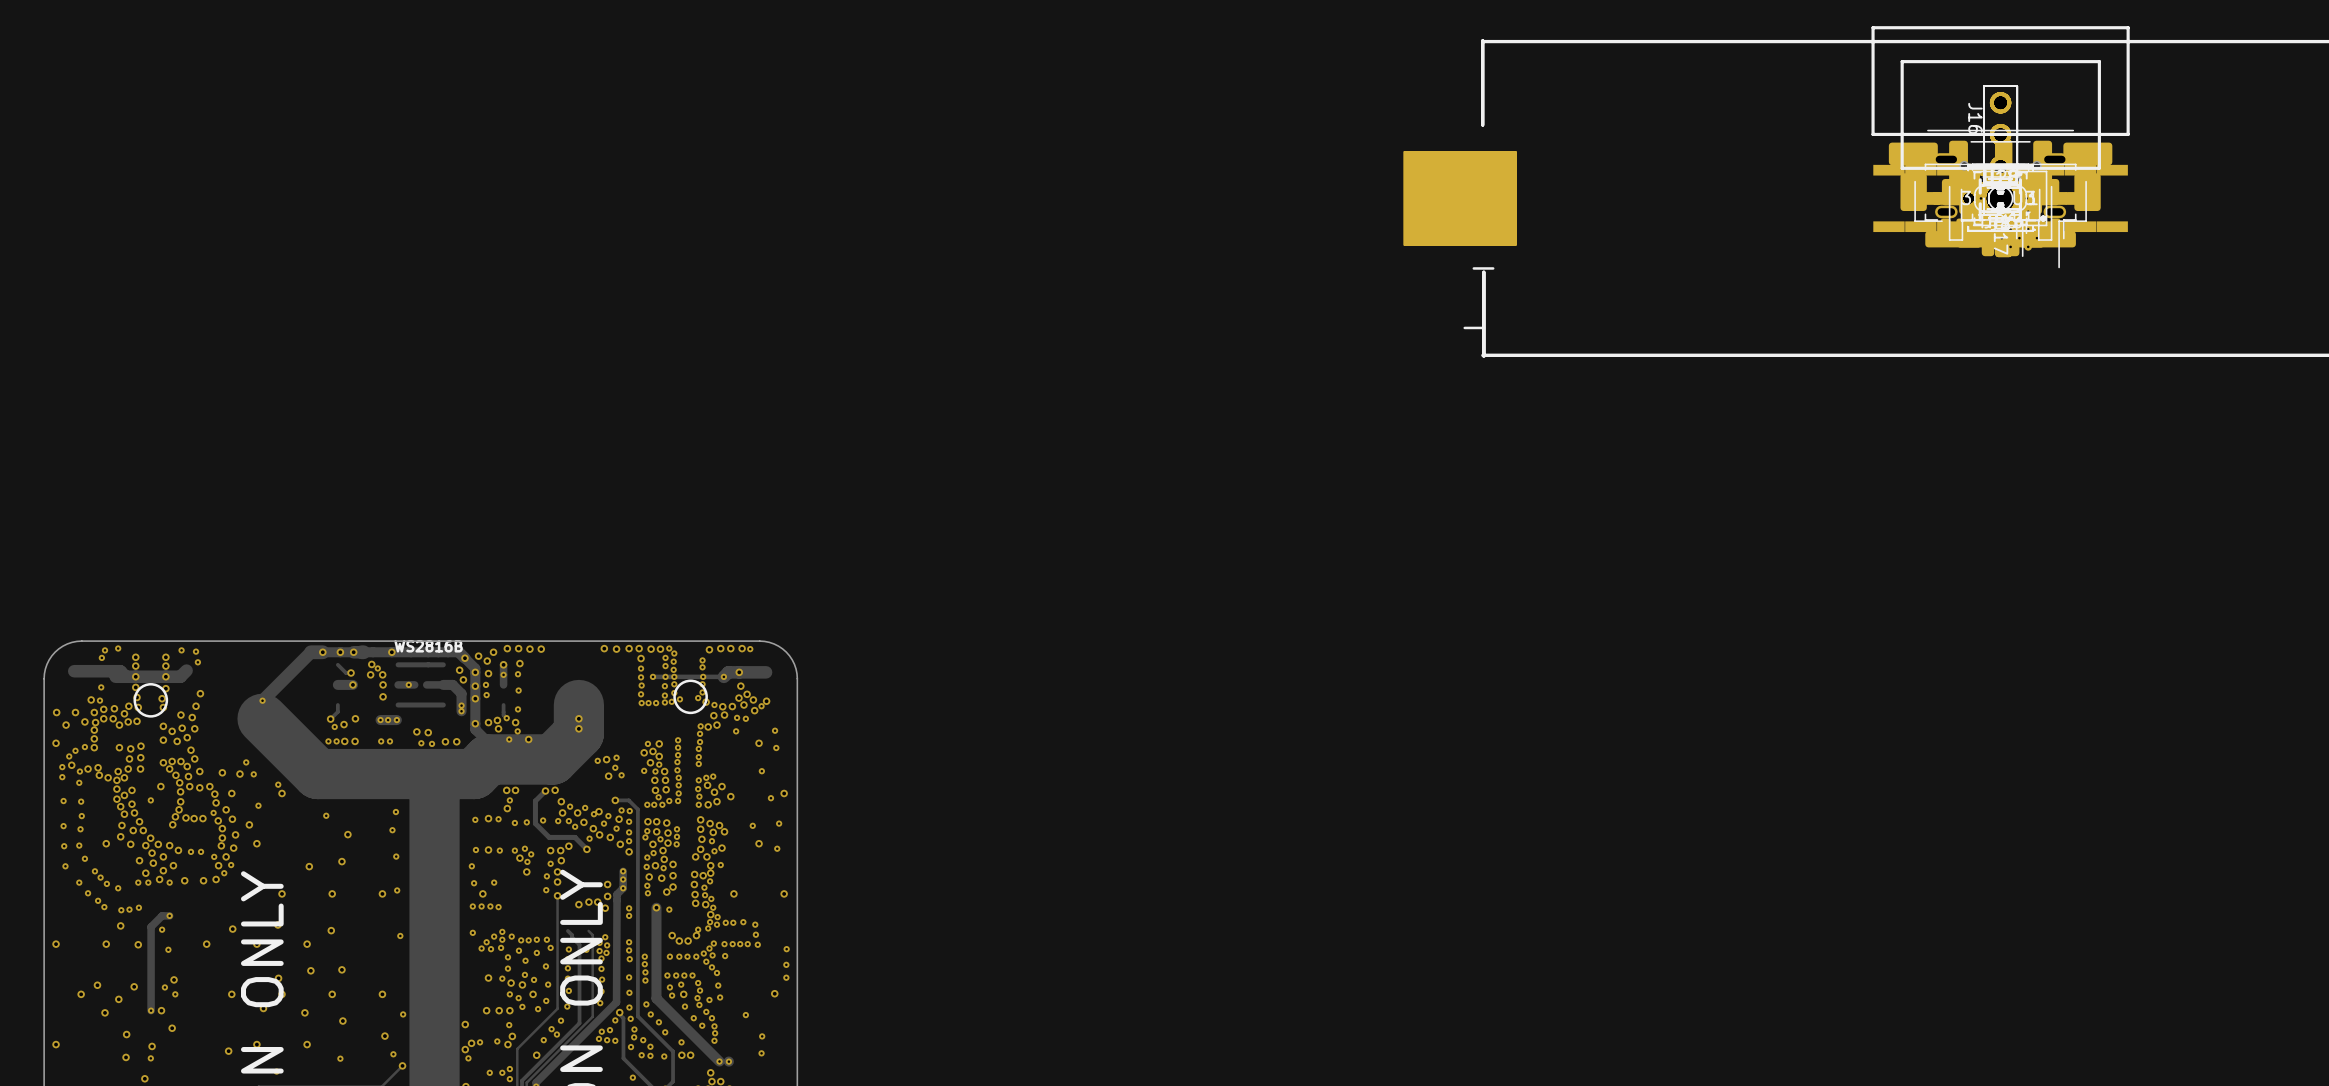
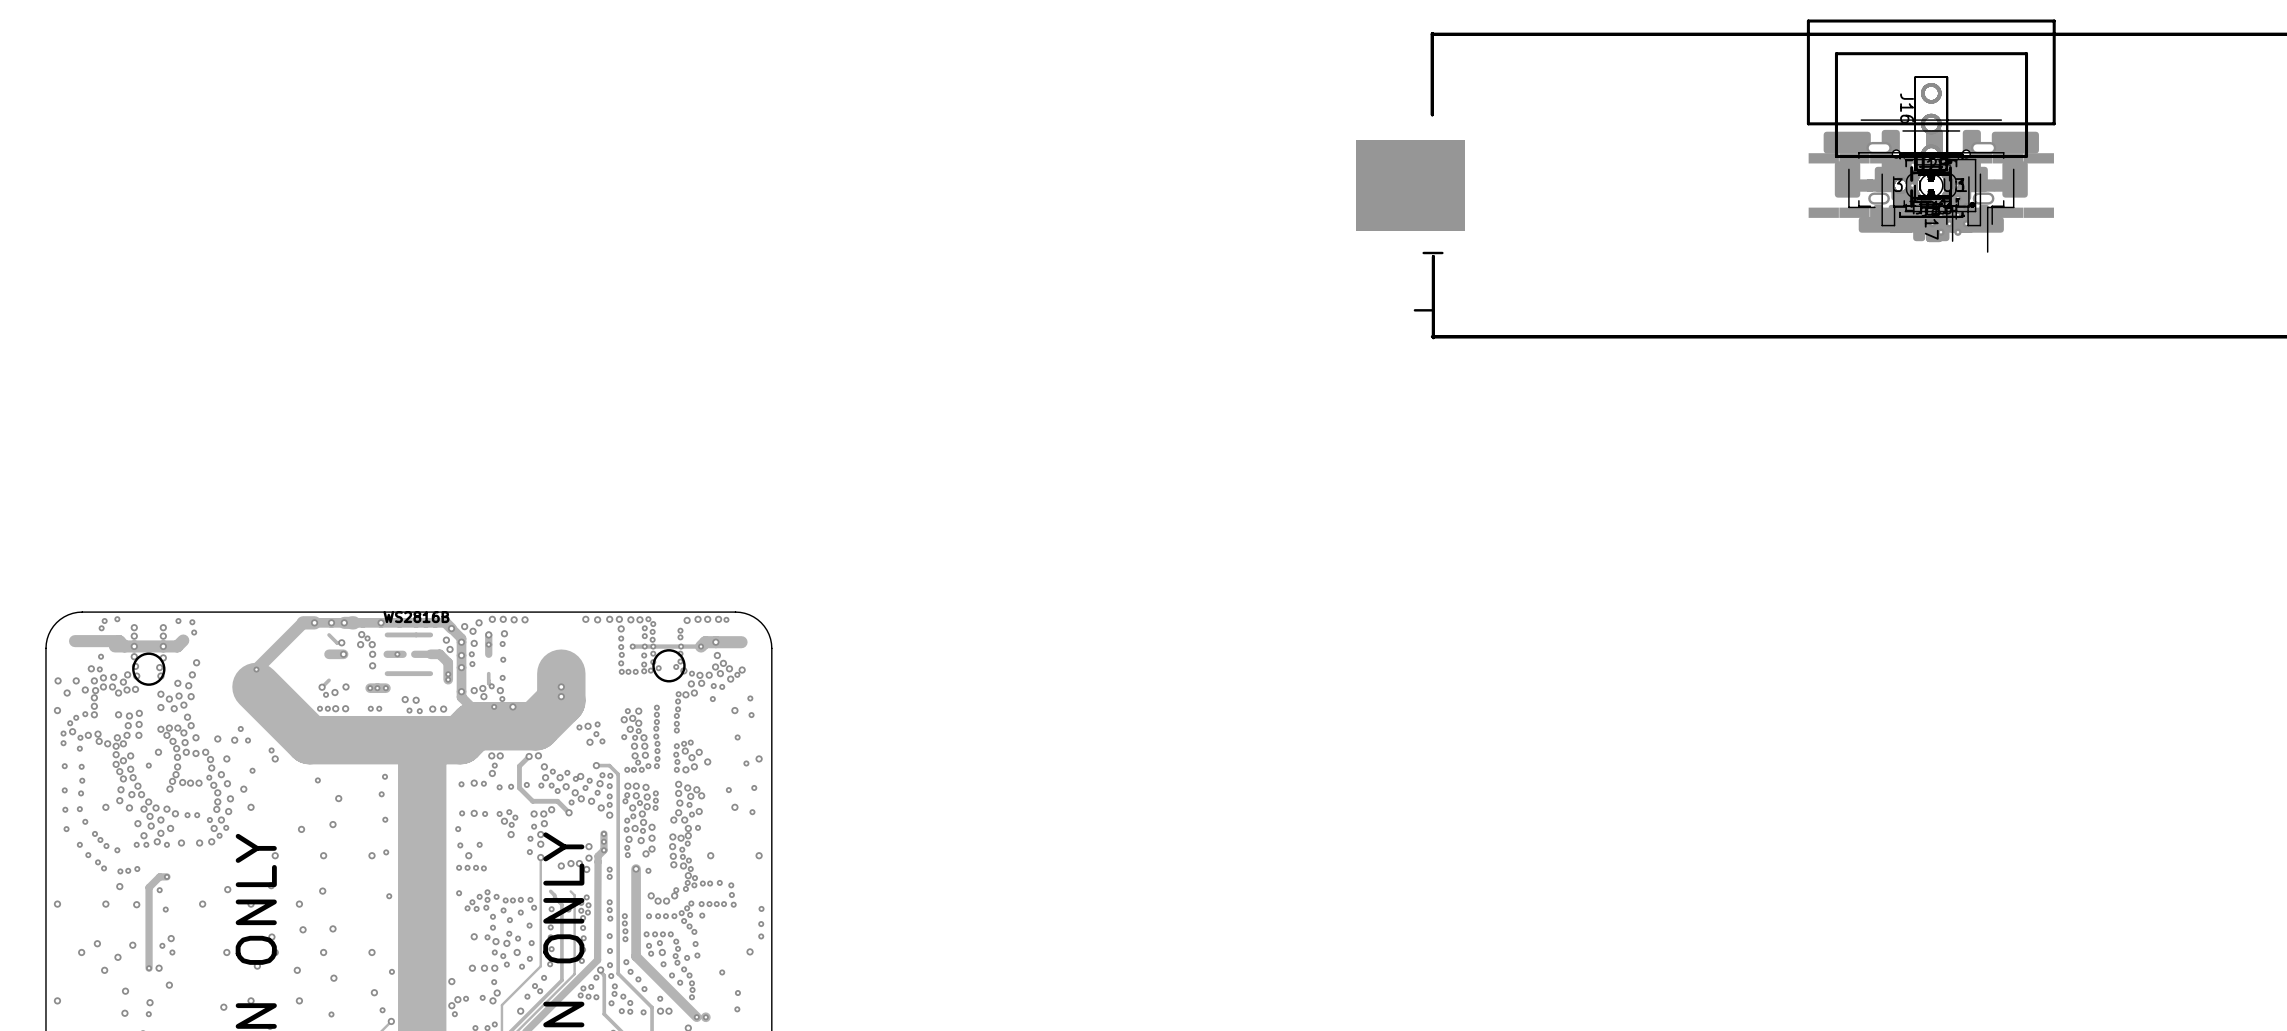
track: (337, 704) (337, 711) -> none

